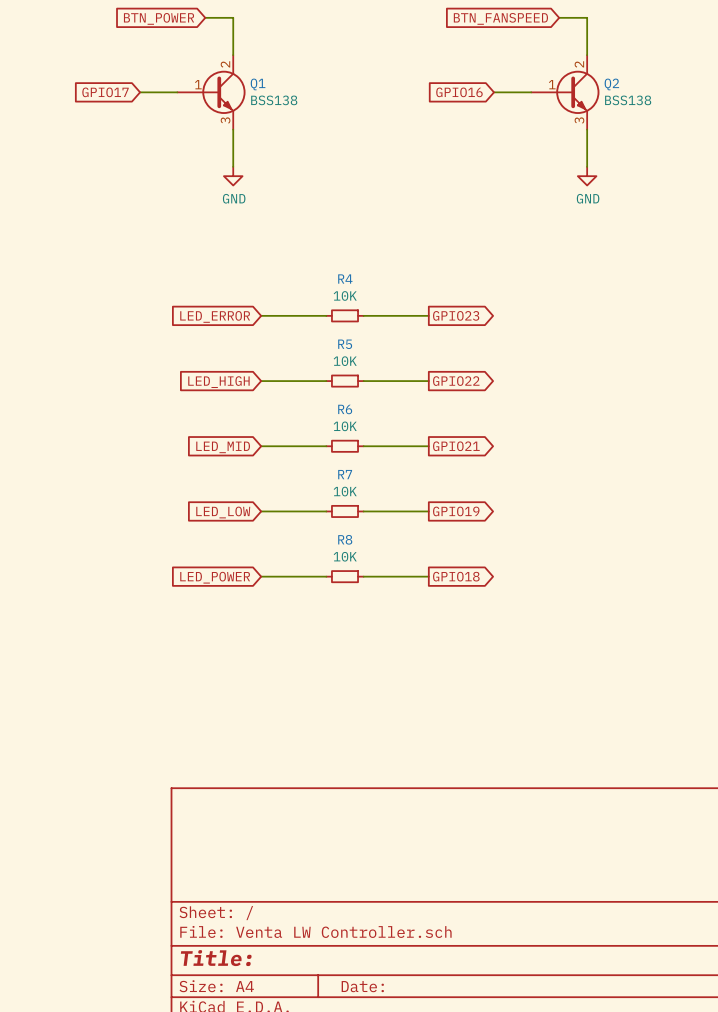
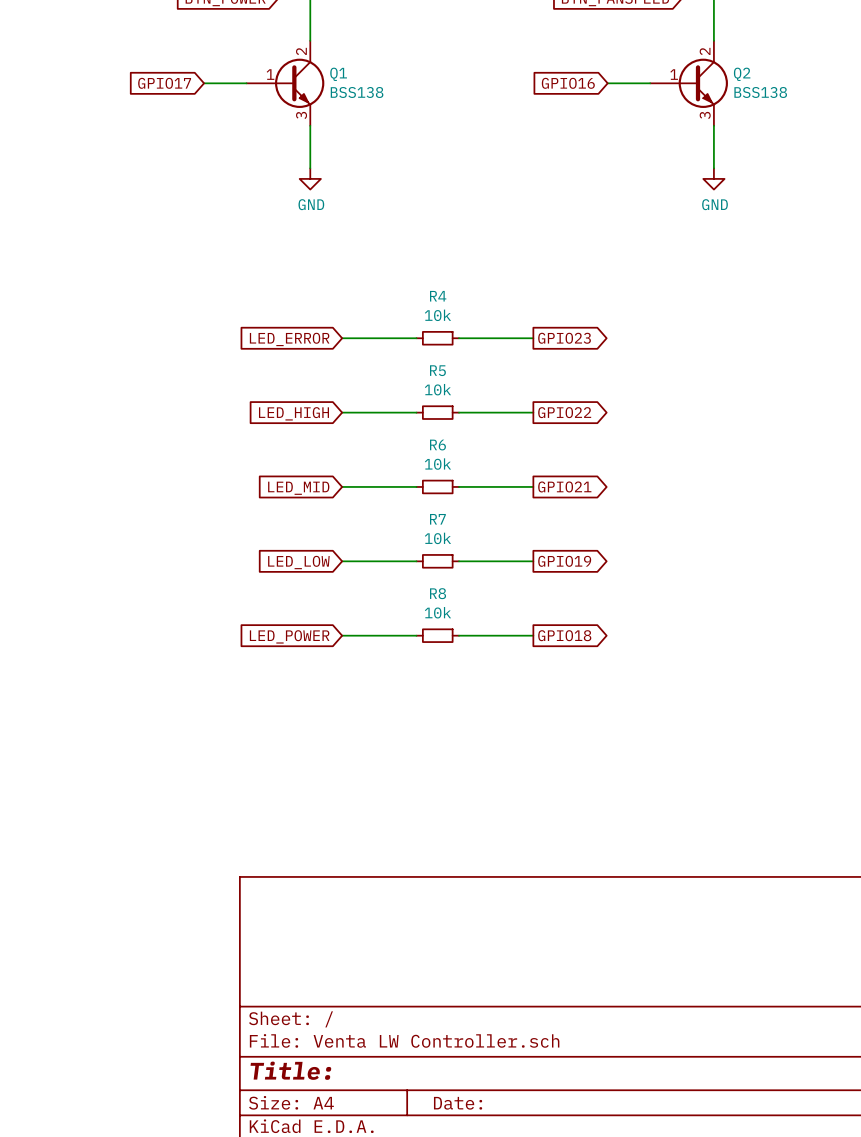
R4 value: 10K (345, 295) -> 10k (437, 315)
R5 value: 10K (345, 361) -> 10k (437, 389)
R6 value: 10K (345, 426) -> 10k (437, 464)
R7 value: 10K (345, 491) -> 10k (437, 538)
R8 value: 10K (345, 556) -> 10k (437, 612)

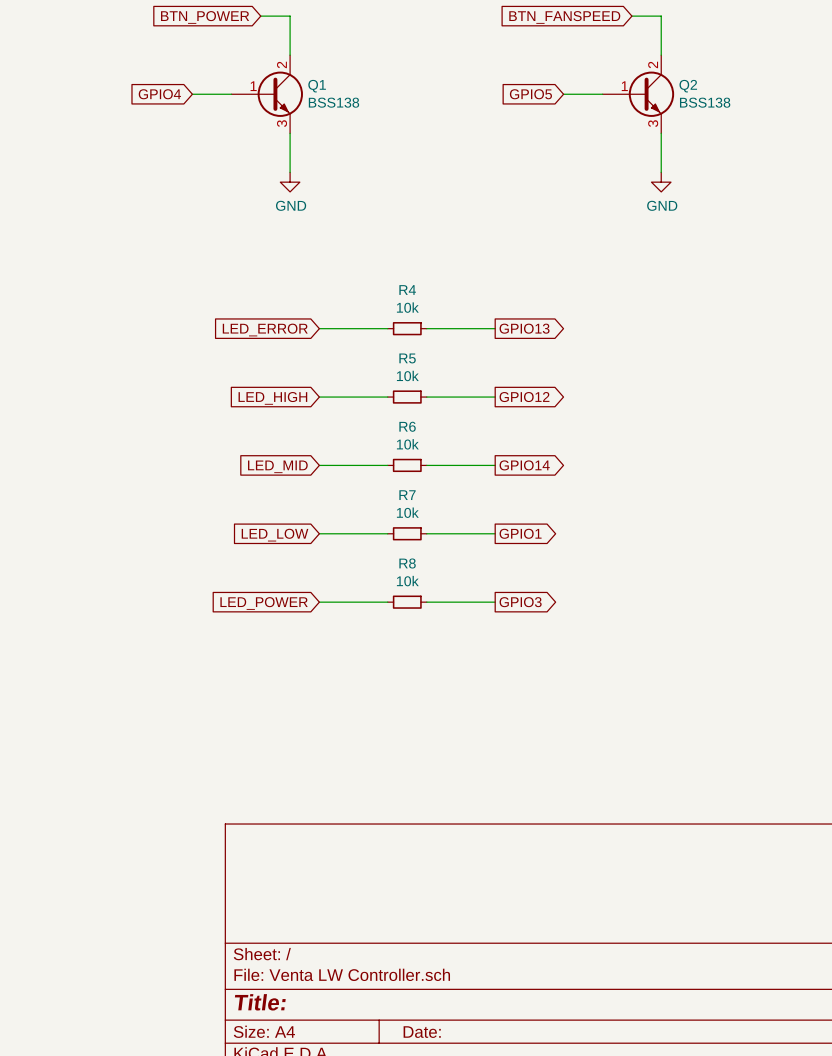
global label: GPIO17 (164, 83) -> GPIO4 (159, 94)
global label: GPIO16 (568, 83) -> GPIO5 (530, 94)
global label: GPIO23 (564, 338) -> GPIO13 (524, 328)
global label: GPIO22 (564, 412) -> GPIO12 (524, 397)
global label: GPIO21 (564, 486) -> GPIO14 (524, 465)
global label: GPIO19 (564, 561) -> GPIO1 (520, 533)
global label: GPIO18 (564, 635) -> GPIO3 (520, 602)

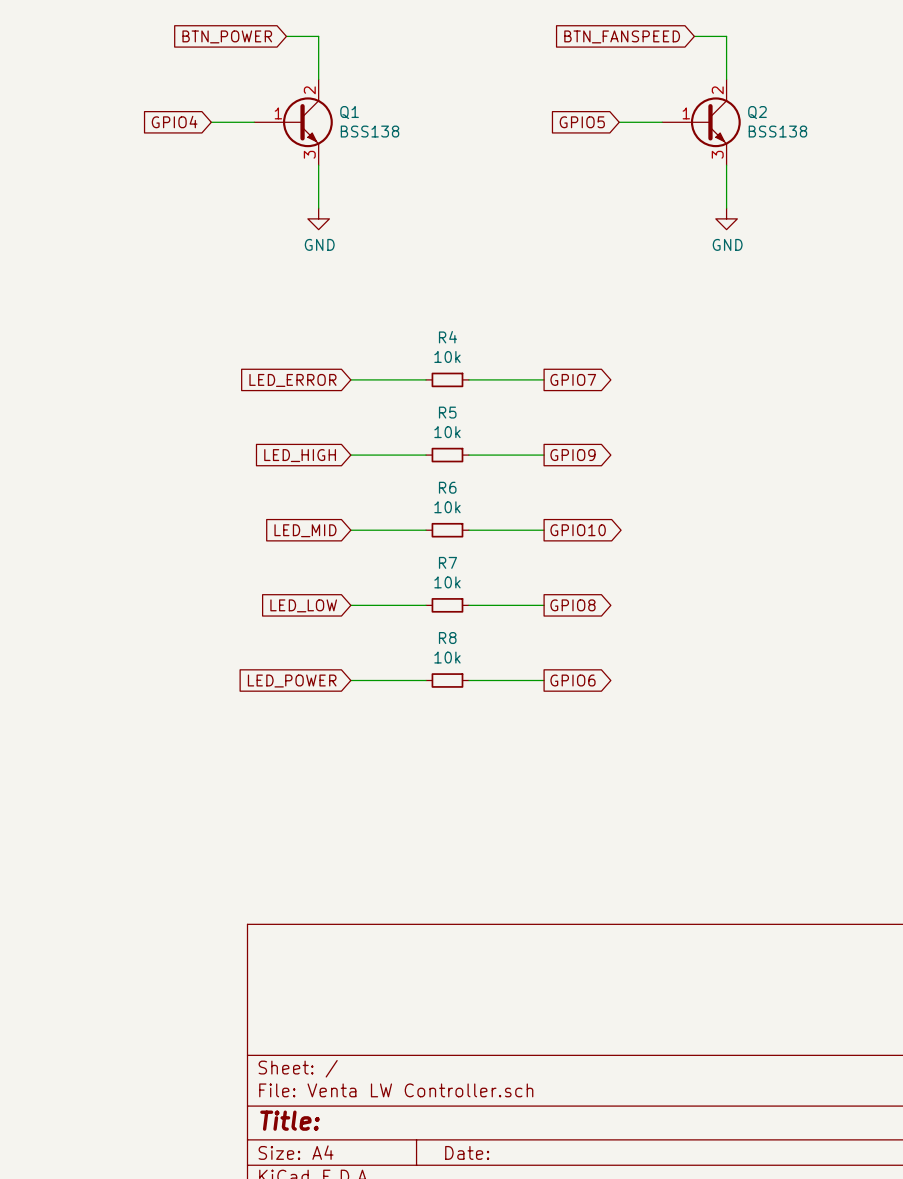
global label: GPIO13 (524, 328) -> GPIO7 (573, 379)
global label: GPIO12 (524, 397) -> GPIO9 (572, 455)
global label: GPIO14 (524, 465) -> GPIO10 (578, 530)
global label: GPIO1 (520, 533) -> GPIO8 (572, 605)
global label: GPIO3 (520, 602) -> GPIO6 (572, 680)

